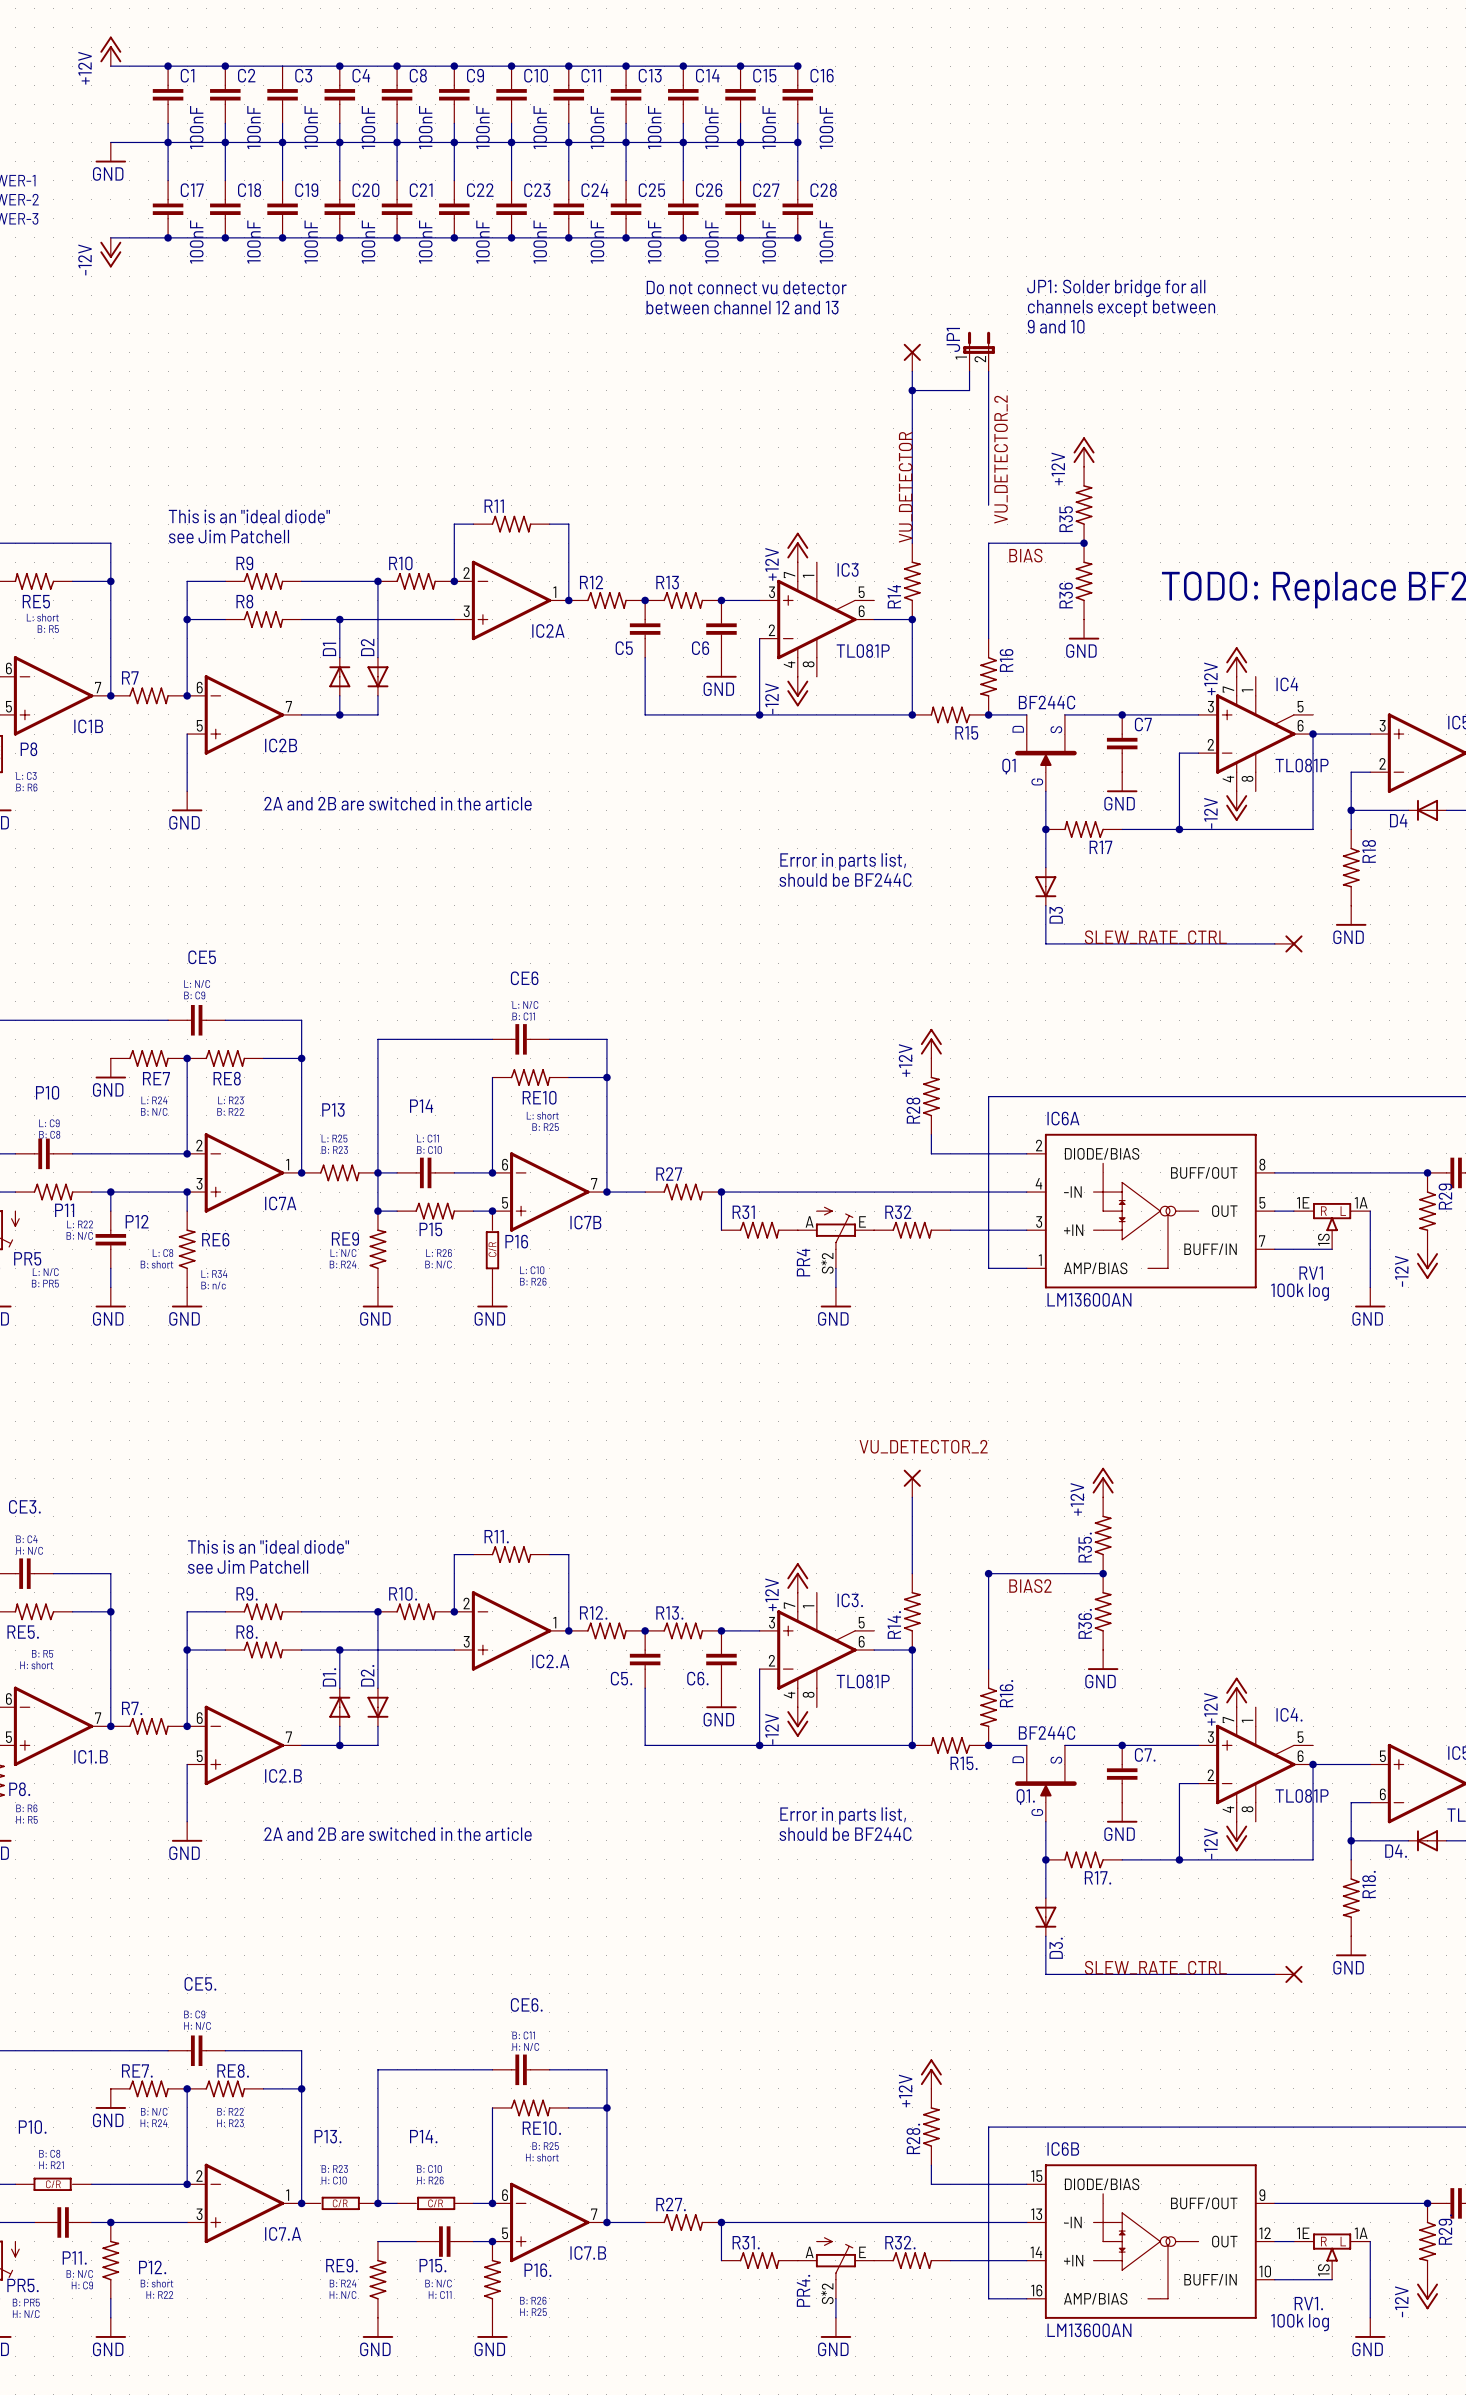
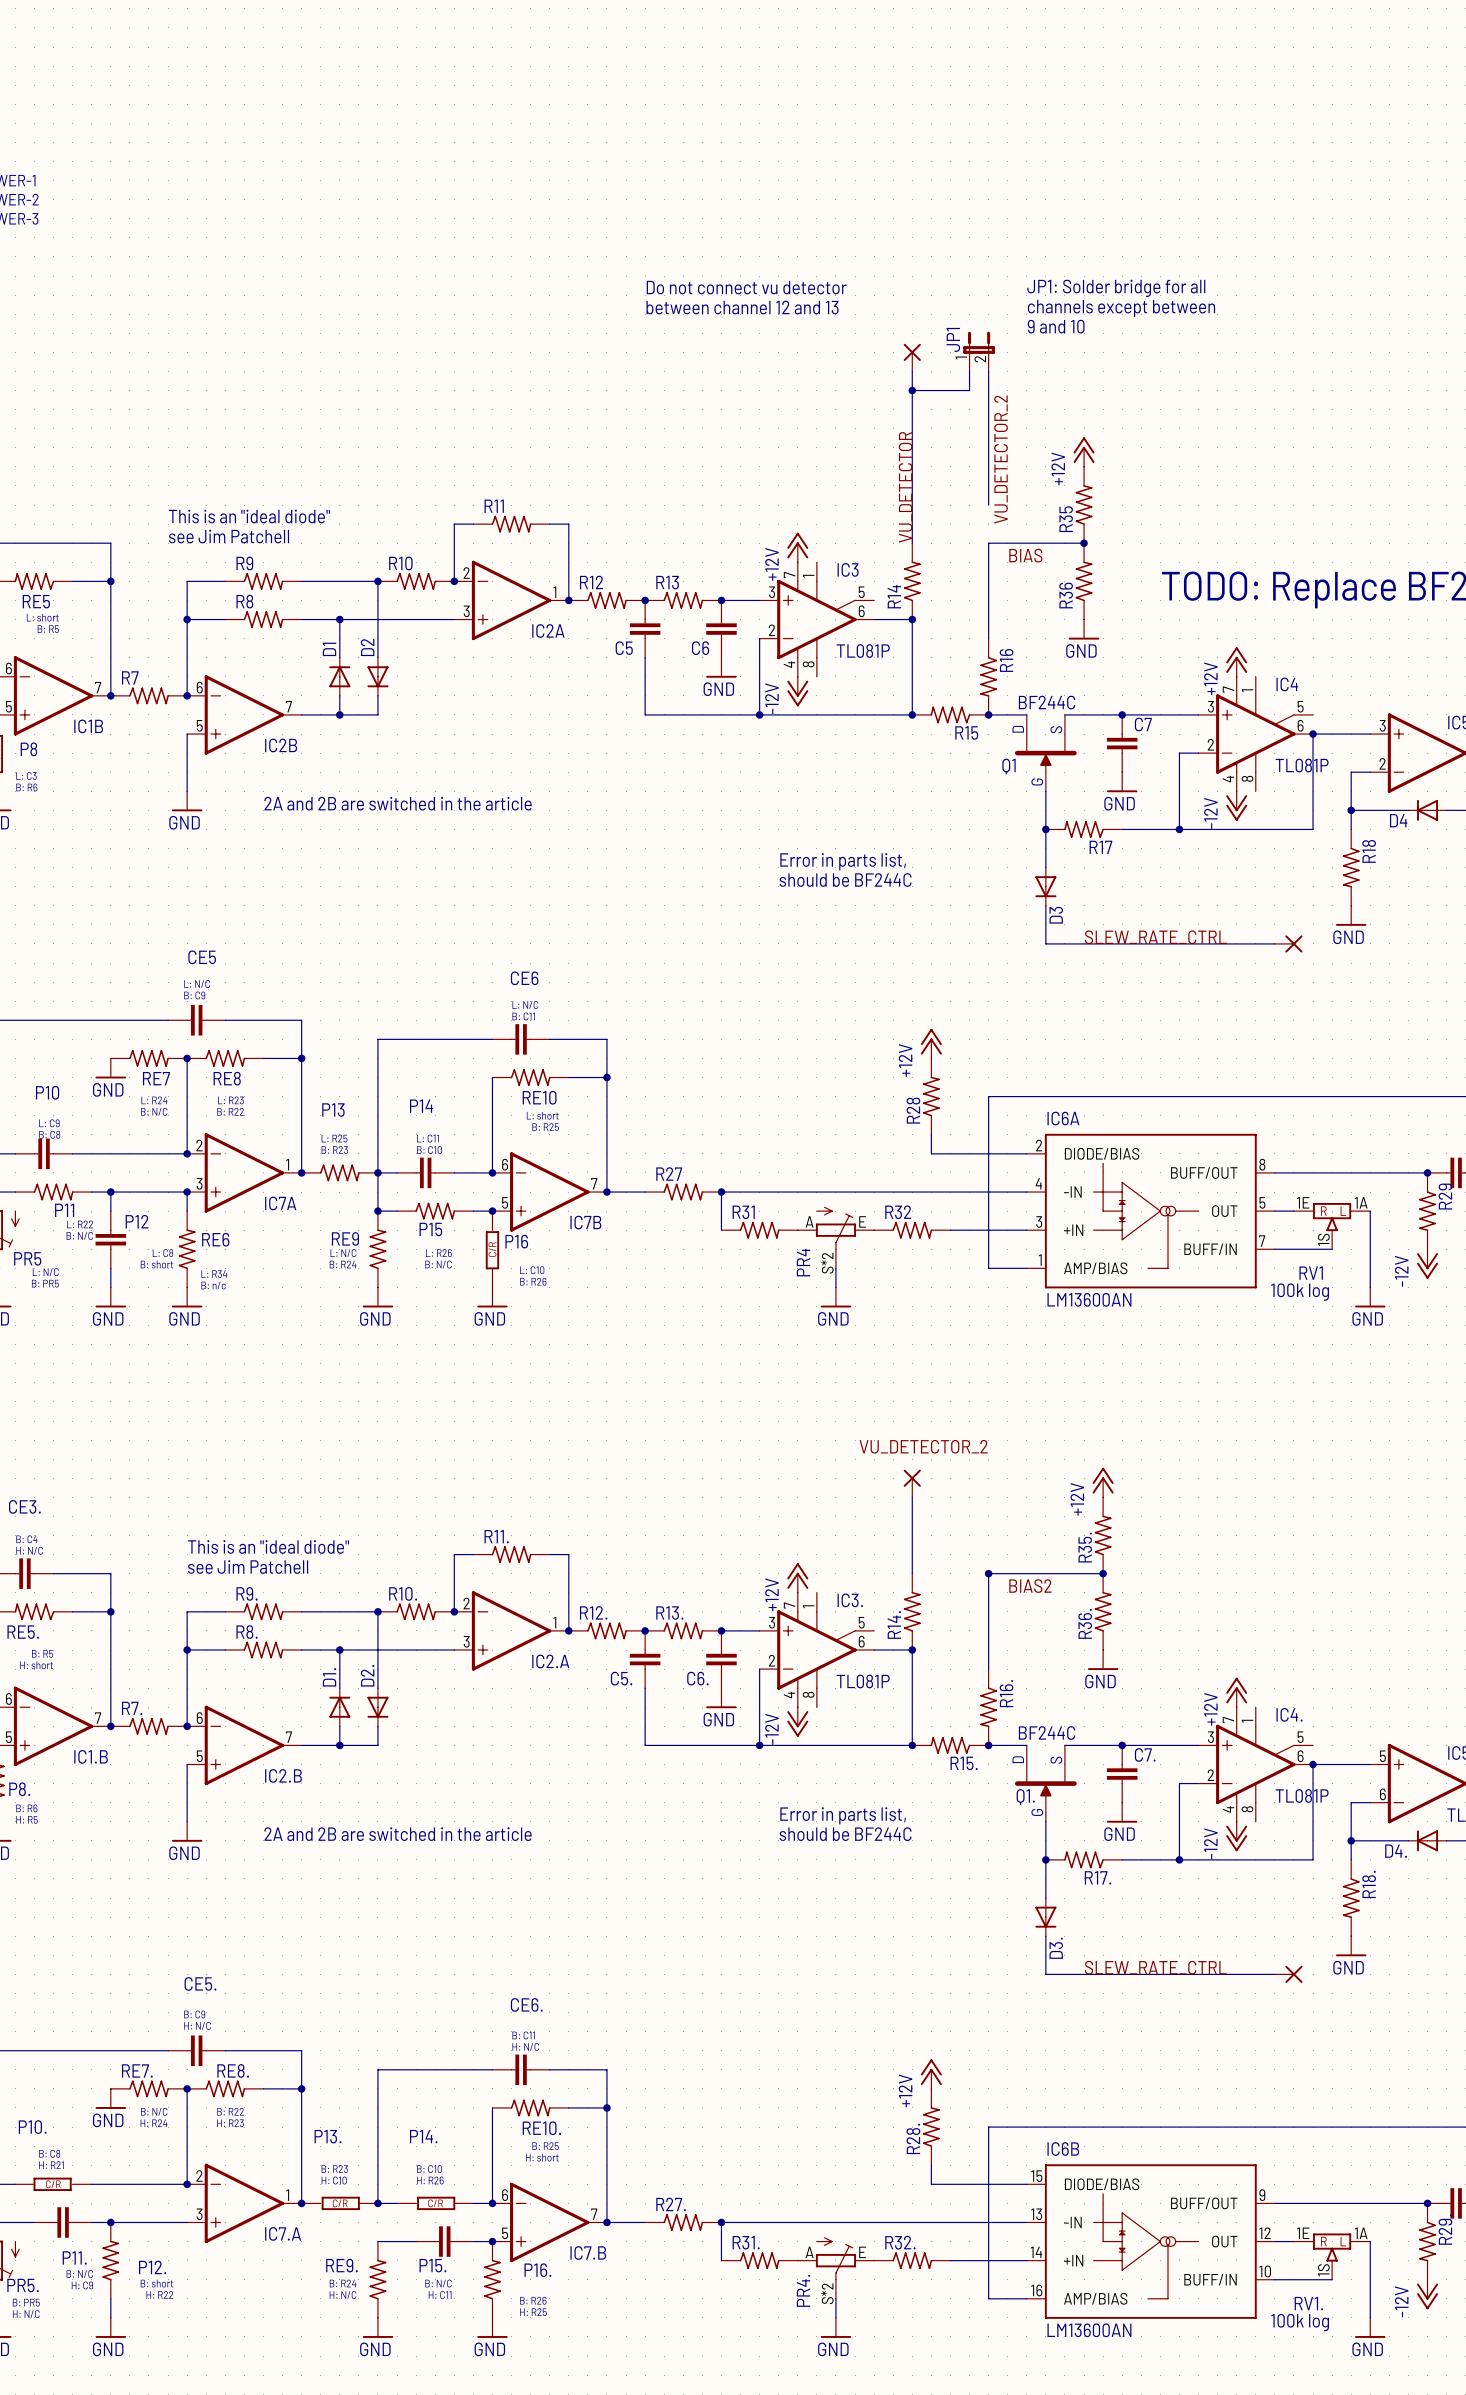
power symbol: +12V (110, 51) -> none
wire: (110, 66) (797, 66) -> none
junction: (168, 66) -> none
junction: (225, 66) -> none
junction: (339, 66) -> none
junction: (397, 66) -> none
junction: (454, 66) -> none
junction: (511, 66) -> none
junction: (568, 66) -> none
junction: (626, 66) -> none
junction: (683, 66) -> none
junction: (740, 66) -> none
junction: (797, 66) -> none
C1: 100nF (168, 94) -> none
C2: 100nF (225, 94) -> none
C3: 100nF (282, 94) -> none
C4: 100nF (339, 94) -> none
C8: 100nF (397, 94) -> none
C9: 100nF (454, 94) -> none
C10: 100nF (511, 94) -> none
C11: 100nF (568, 94) -> none
C13: 100nF (626, 94) -> none
C14: 100nF (683, 94) -> none
C15: 100nF (740, 94) -> none
C16: 100nF (797, 94) -> none
wire: (168, 123) (168, 180) -> none
wire: (225, 123) (225, 180) -> none
wire: (282, 123) (282, 180) -> none
wire: (339, 123) (339, 180) -> none
wire: (397, 123) (397, 180) -> none
wire: (454, 123) (454, 180) -> none
wire: (511, 123) (511, 180) -> none
wire: (568, 123) (568, 180) -> none
wire: (626, 123) (626, 180) -> none
wire: (683, 123) (683, 180) -> none
wire: (740, 123) (740, 180) -> none
wire: (797, 123) (797, 180) -> none
wire: (110, 142) (797, 142) -> none
junction: (168, 142) -> none
junction: (225, 142) -> none
junction: (282, 142) -> none
junction: (339, 142) -> none
junction: (397, 142) -> none
junction: (454, 142) -> none
junction: (511, 142) -> none
junction: (568, 142) -> none
junction: (626, 142) -> none
junction: (683, 142) -> none
junction: (740, 142) -> none
junction: (797, 142) -> none
power symbol: GND (110, 152) -> none
C17: 100nF (168, 209) -> none
C18: 100nF (225, 209) -> none
C19: 100nF (282, 209) -> none
C20: 100nF (339, 209) -> none
C21: 100nF (397, 209) -> none
C22: 100nF (454, 209) -> none
C23: 100nF (511, 209) -> none
C24: 100nF (568, 209) -> none
C25: 100nF (626, 209) -> none
C26: 100nF (683, 209) -> none
C27: 100nF (740, 209) -> none
C28: 100nF (797, 209) -> none
wire: (110, 237) (797, 237) -> none
junction: (168, 237) -> none
junction: (225, 237) -> none
junction: (282, 237) -> none
junction: (339, 237) -> none
junction: (397, 237) -> none
junction: (454, 237) -> none
junction: (511, 237) -> none
junction: (568, 237) -> none
junction: (626, 237) -> none
junction: (683, 237) -> none
junction: (740, 237) -> none
junction: (797, 237) -> none
power symbol: -12V (110, 252) -> none

